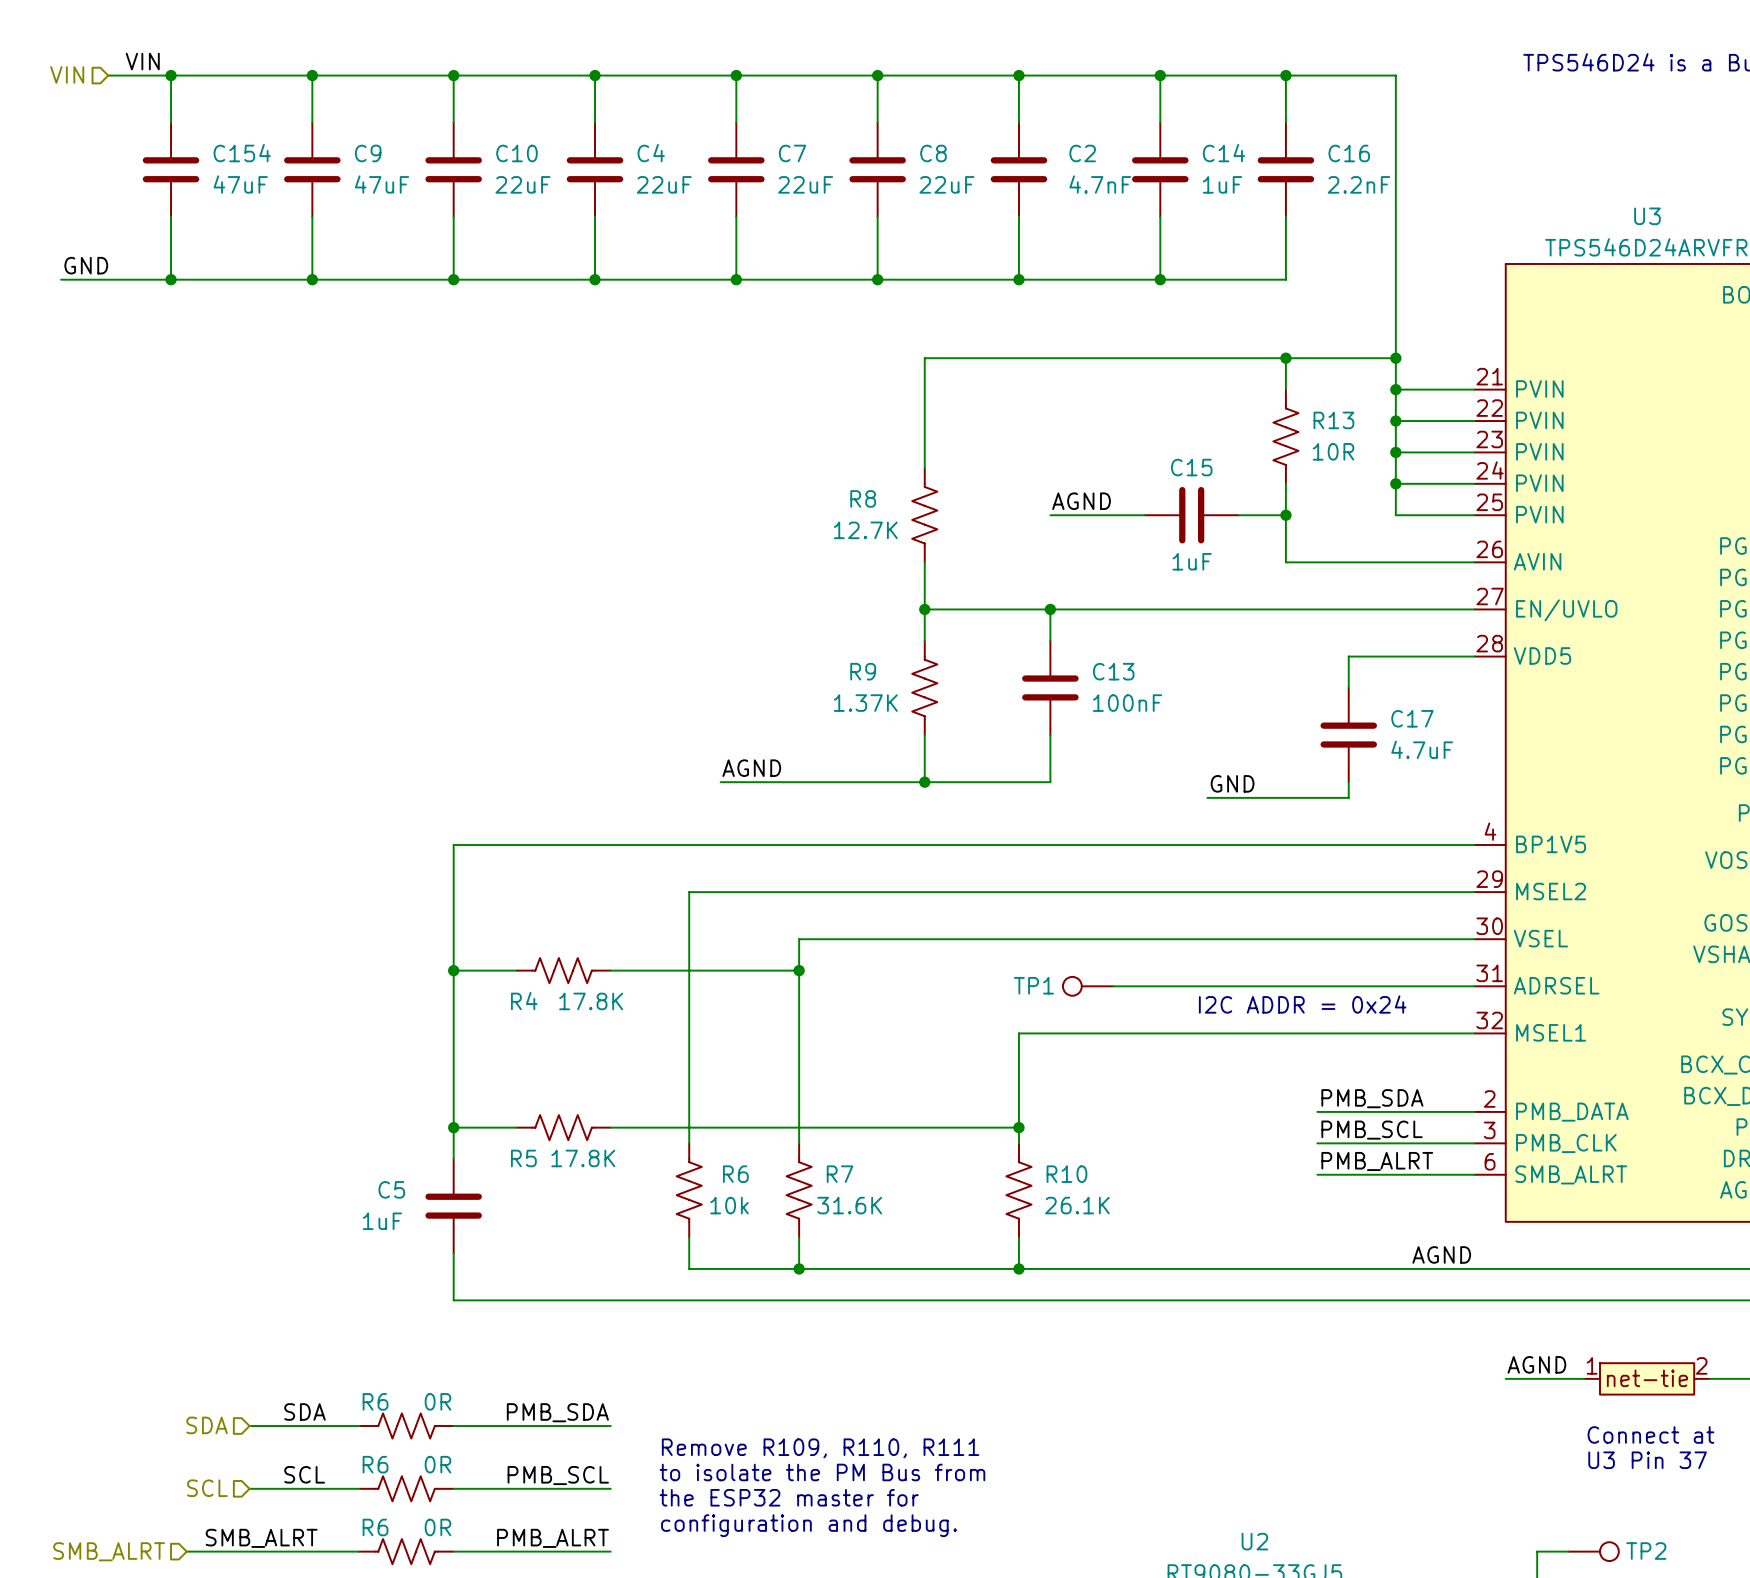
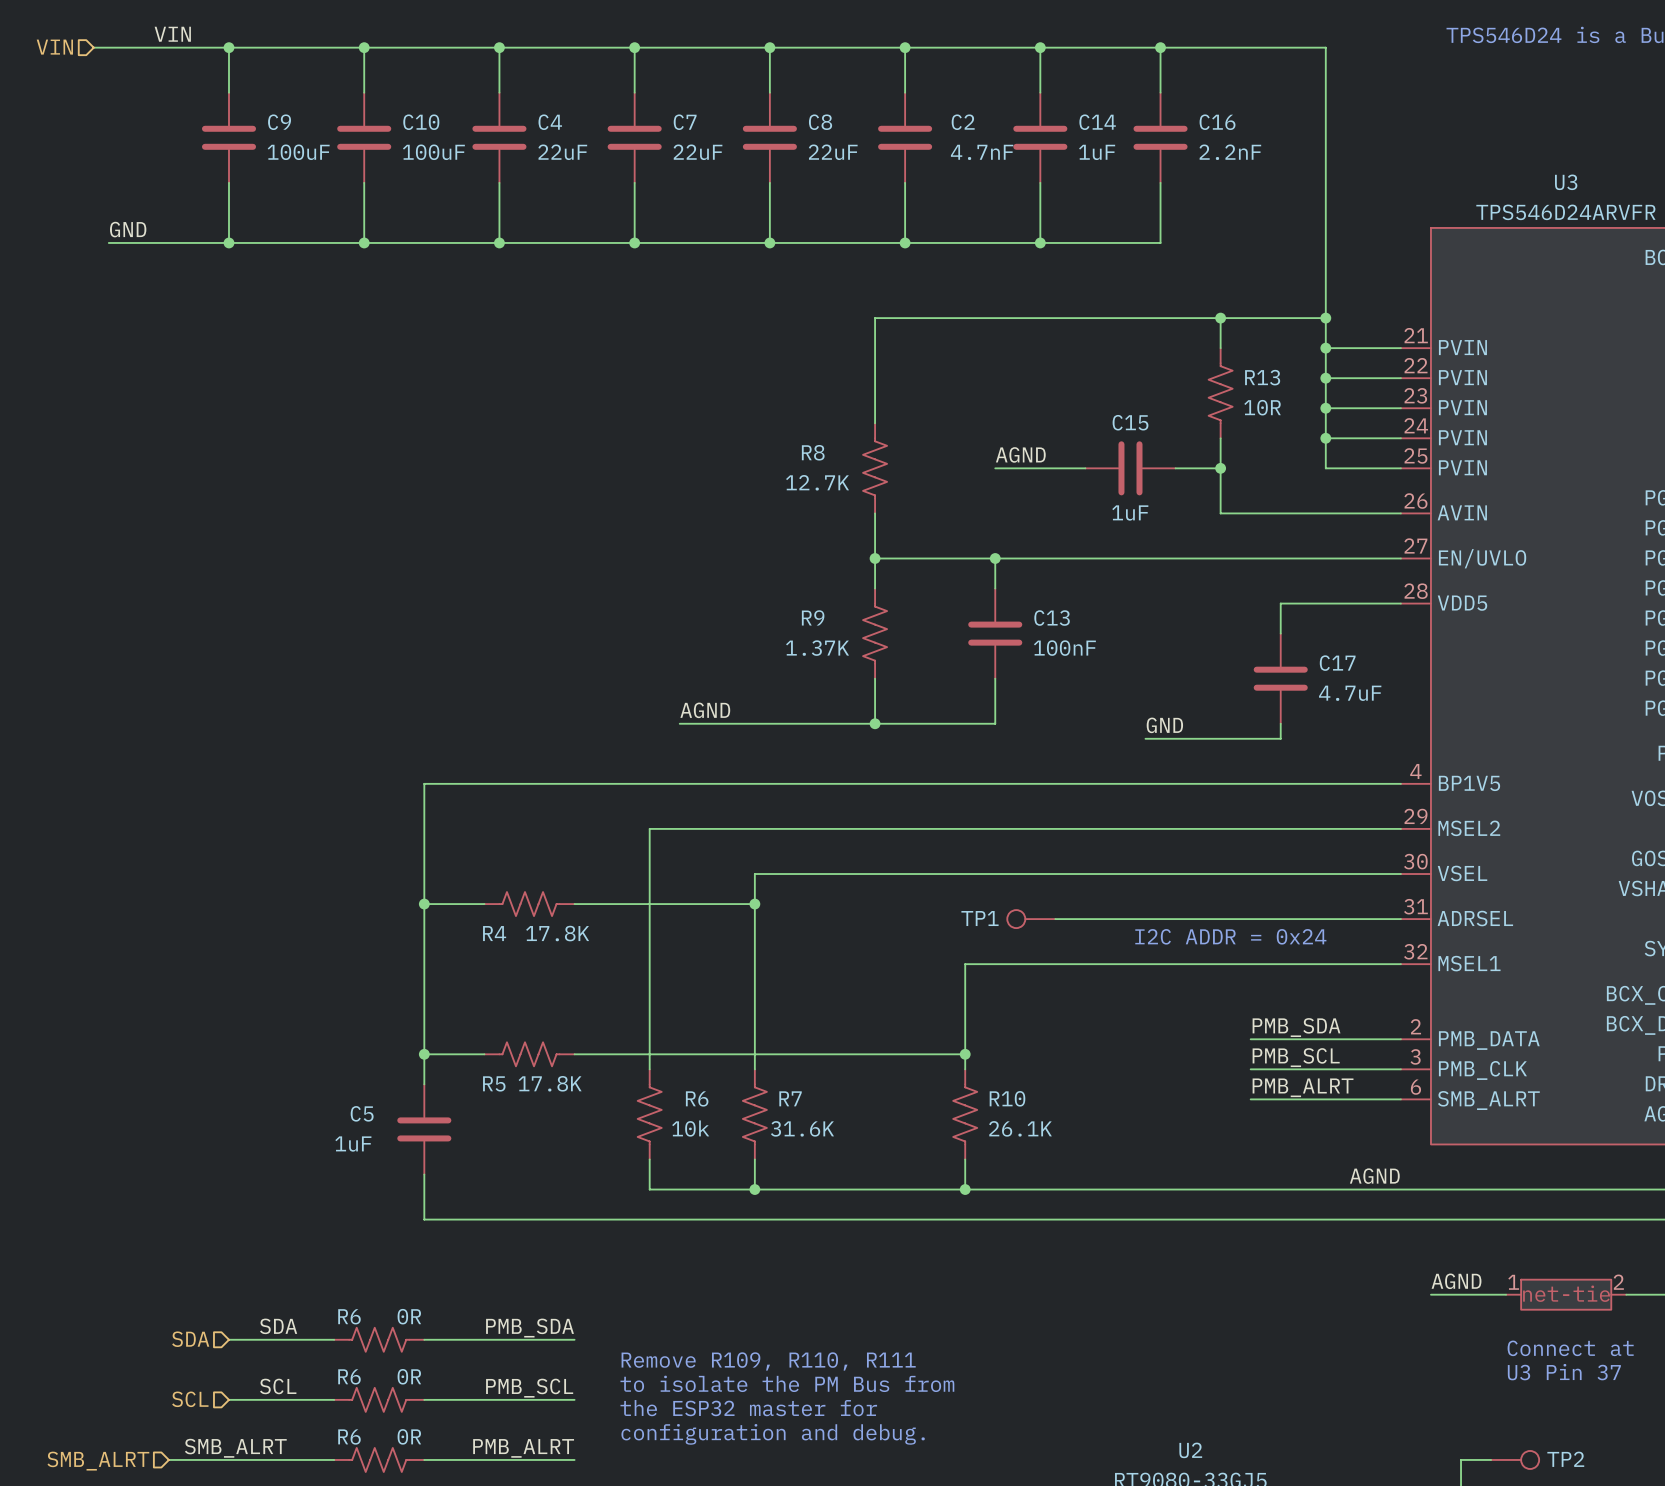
label position: VIN (142, 61) -> VIN (172, 34)
wire: (171, 75) (171, 122) -> none
junction: (171, 75) -> none
junction: none -> (229, 47)
wire: (312, 75) (312, 122) -> (229, 47) (229, 92)
junction: (312, 75) -> none
junction: none -> (364, 47)
wire: (453, 75) (453, 122) -> (364, 47) (364, 92)
junction: (453, 75) -> none
junction: none -> (499, 47)
wire: (595, 75) (595, 122) -> (499, 47) (499, 92)
junction: (595, 75) -> none
junction: none -> (634, 47)
wire: (736, 75) (736, 122) -> (634, 47) (634, 92)
junction: (736, 75) -> none
junction: none -> (769, 47)
wire: (877, 75) (877, 122) -> (769, 47) (769, 92)
junction: (877, 75) -> none
junction: none -> (905, 47)
wire: (1018, 75) (1018, 122) -> (905, 47) (905, 92)
junction: (1018, 75) -> none
junction: none -> (1040, 47)
wire: (1160, 75) (1160, 122) -> (1040, 47) (1040, 92)
junction: (1160, 75) -> none
junction: none -> (1160, 47)
wire: (1285, 75) (1285, 122) -> (1160, 47) (1160, 92)
junction: (1285, 75) -> none
C154: 47uF (171, 169) -> none
C9 position: (312, 169) -> (229, 137)
C10 position: (453, 169) -> (364, 137)
C4 position: (595, 169) -> (499, 137)
C7 position: (736, 169) -> (634, 137)
C8 position: (877, 169) -> (769, 137)
C2 position: (1018, 169) -> (905, 137)
C14 position: (1160, 169) -> (1040, 137)
C16 position: (1285, 169) -> (1160, 137)
C9 value: 47uF (382, 184) -> 100uF (298, 152)
C10 value: 22uF (522, 184) -> 100uF (433, 152)
wire: (171, 216) (171, 279) -> none
wire: (312, 216) (312, 279) -> (229, 182) (229, 242)
wire: (453, 216) (453, 279) -> (364, 182) (364, 242)
wire: (595, 216) (595, 279) -> (499, 182) (499, 242)
wire: (736, 216) (736, 279) -> (634, 182) (634, 242)
wire: (877, 216) (877, 279) -> (769, 182) (769, 242)
wire: (1018, 216) (1018, 279) -> (905, 182) (905, 242)
wire: (1160, 216) (1160, 279) -> (1040, 182) (1040, 242)
wire: (1285, 216) (1285, 279) (1223, 279) -> (1160, 182) (1160, 242)
label position: GND (86, 265) -> GND (128, 229)
wire: (61, 279) (123, 279) -> none
junction: (171, 279) -> none
junction: none -> (229, 242)
junction: (312, 279) -> none
junction: none -> (364, 242)
junction: (453, 279) -> none
junction: none -> (499, 242)
junction: (595, 279) -> none
junction: none -> (634, 242)
junction: (736, 279) -> none
junction: none -> (769, 242)
junction: (877, 279) -> none
junction: none -> (905, 242)
junction: (1018, 279) -> none
junction: none -> (1040, 242)
junction: (1160, 279) -> none

